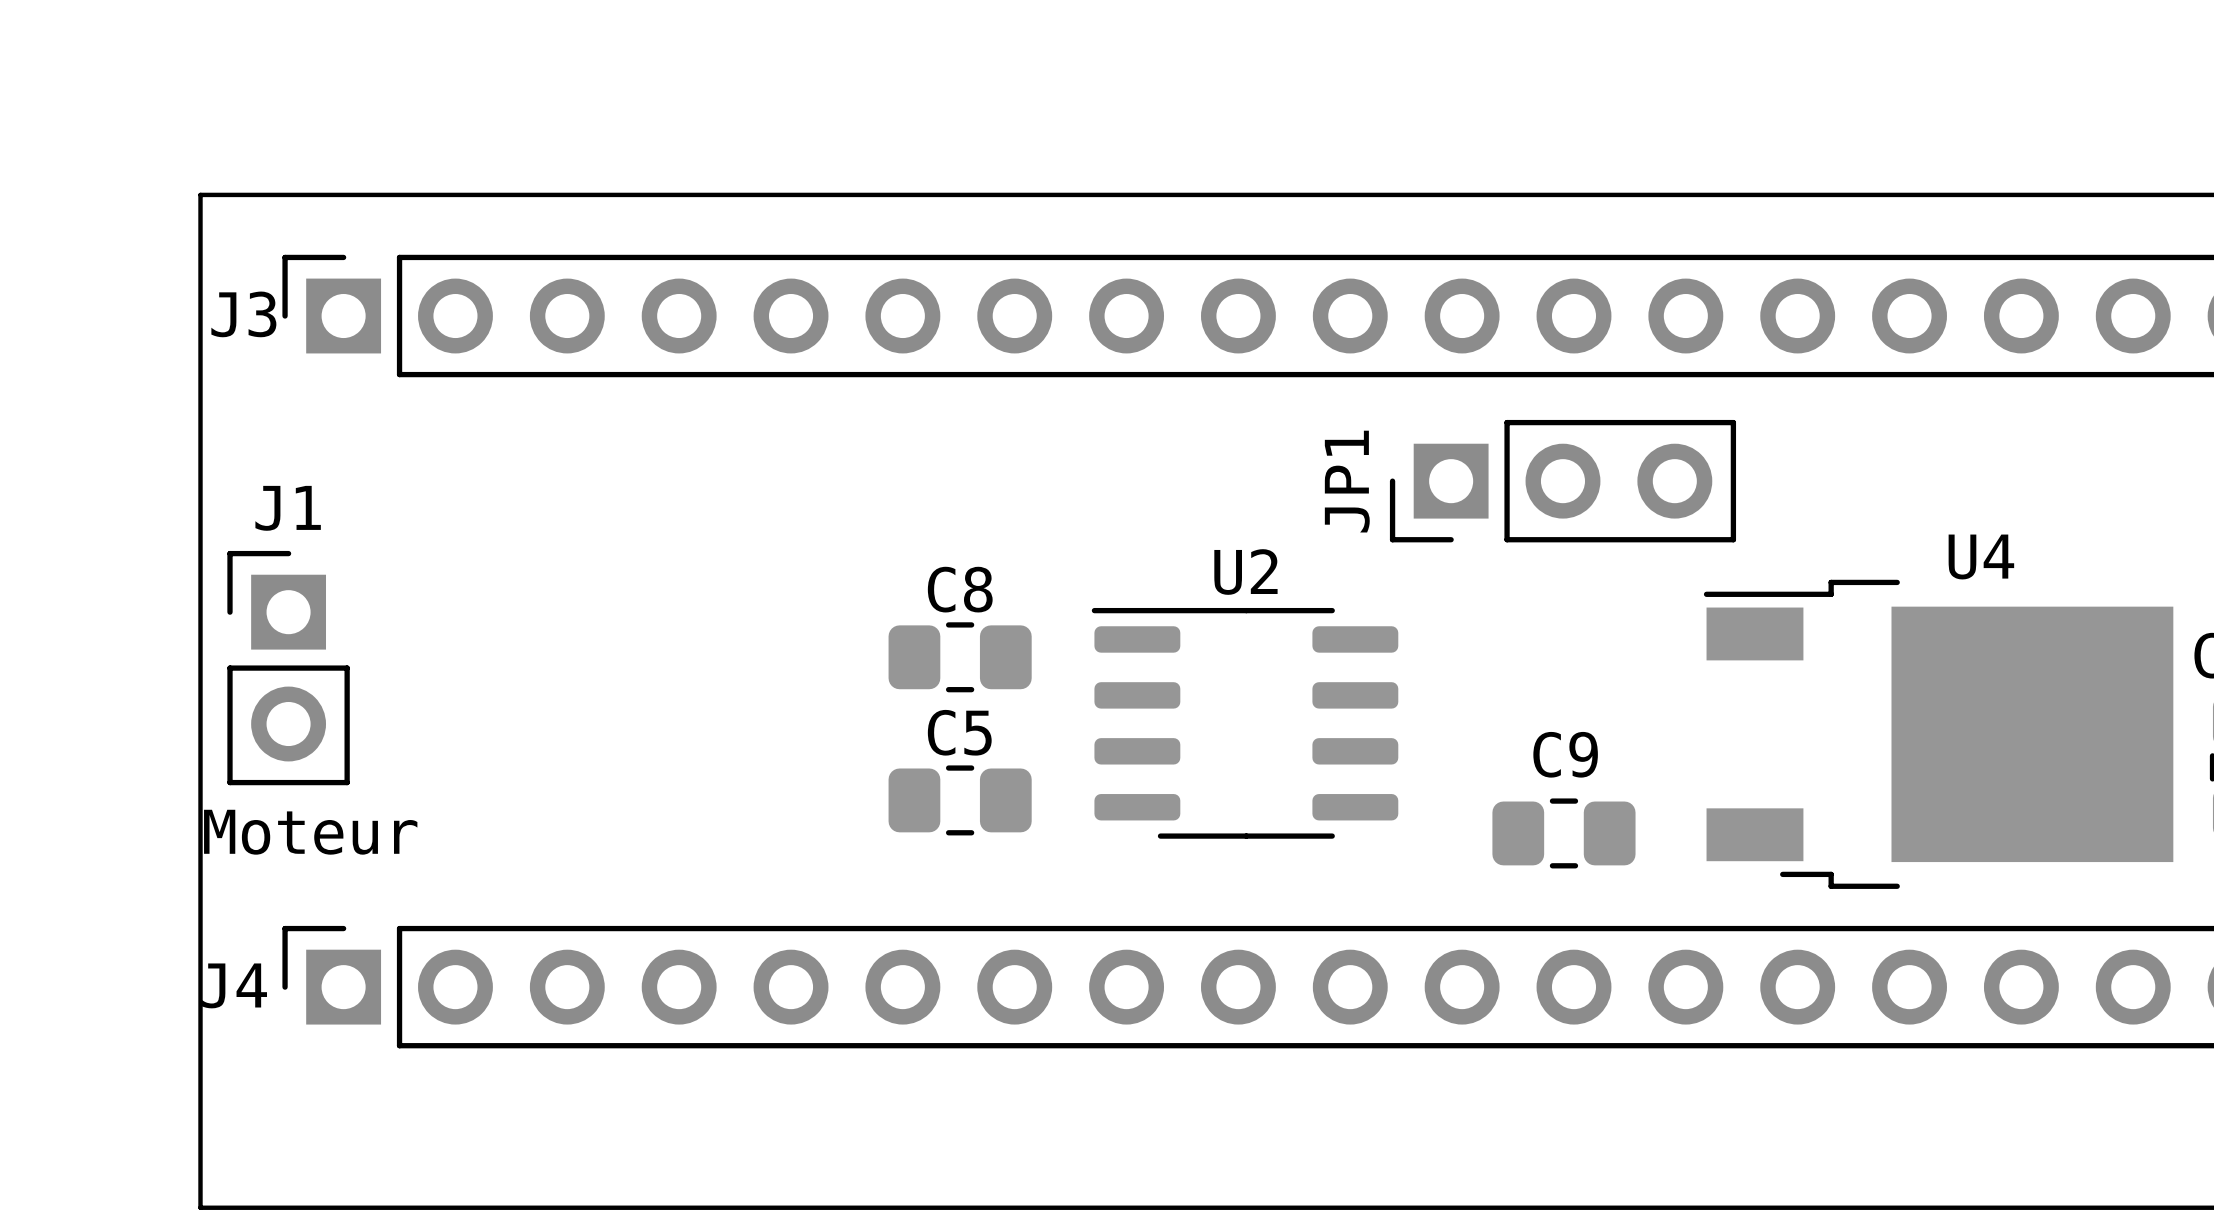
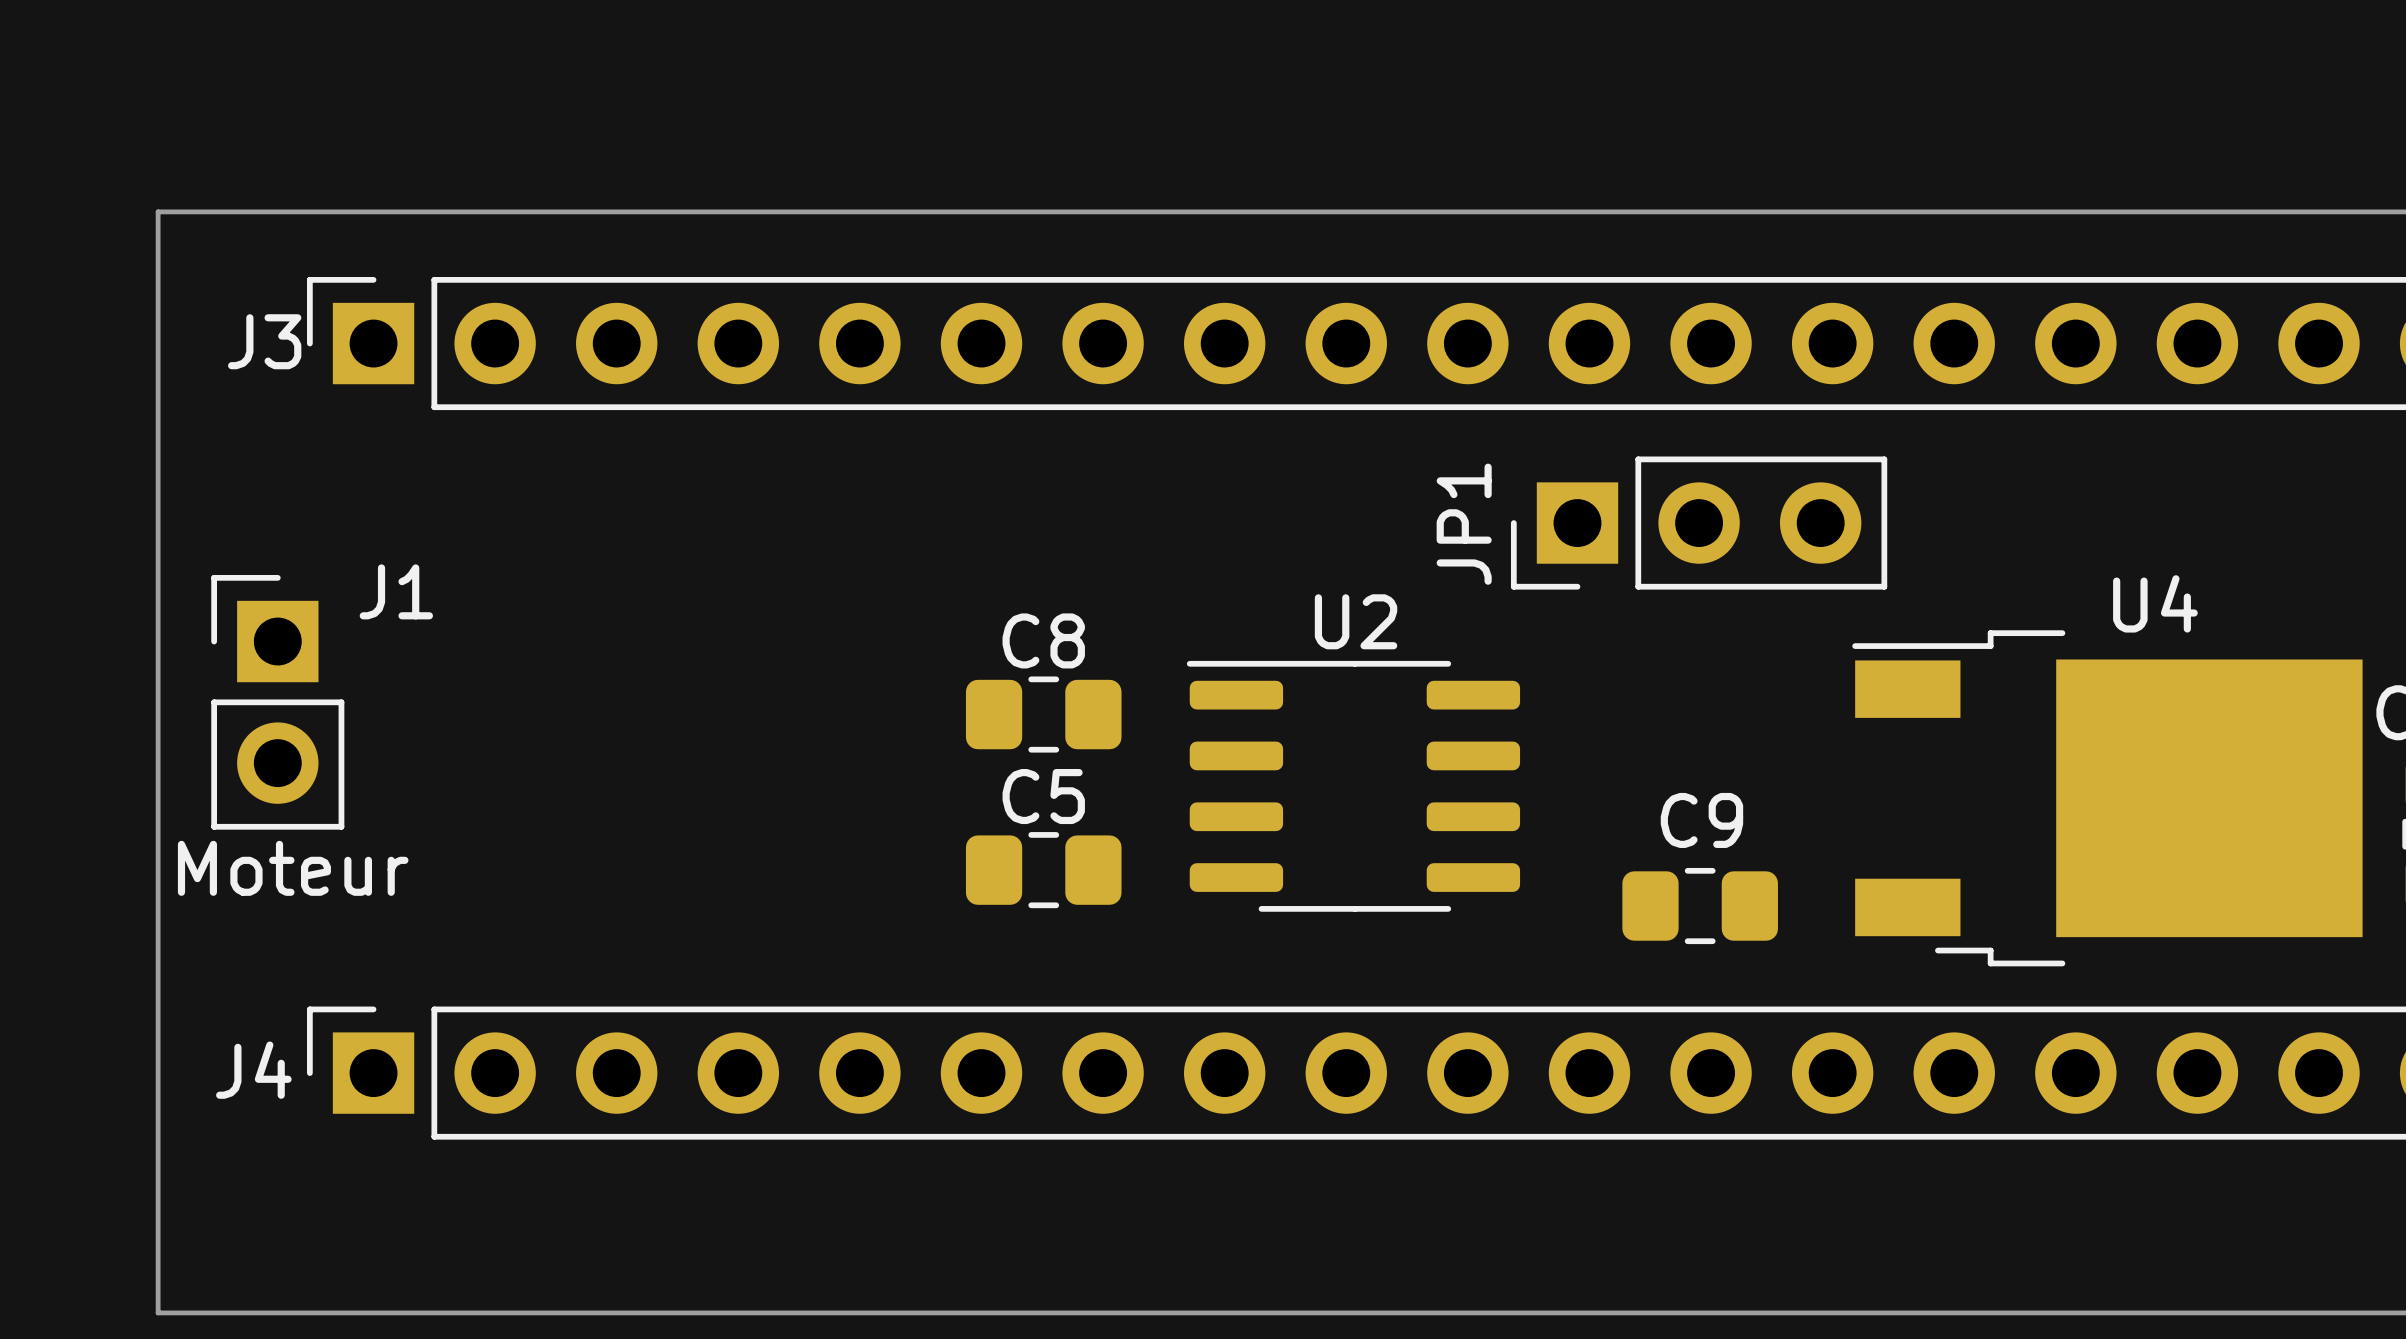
board edge: (200, 194) (200, 1207) -> (217, 211) (158, 211) (158, 1312) (217, 1312)
J1 name position: J1 (288, 508) -> J1 (396, 591)
J1 position: (288, 668) -> (277, 702)
text position: Moteur (310, 832) -> Moteur (293, 868)

